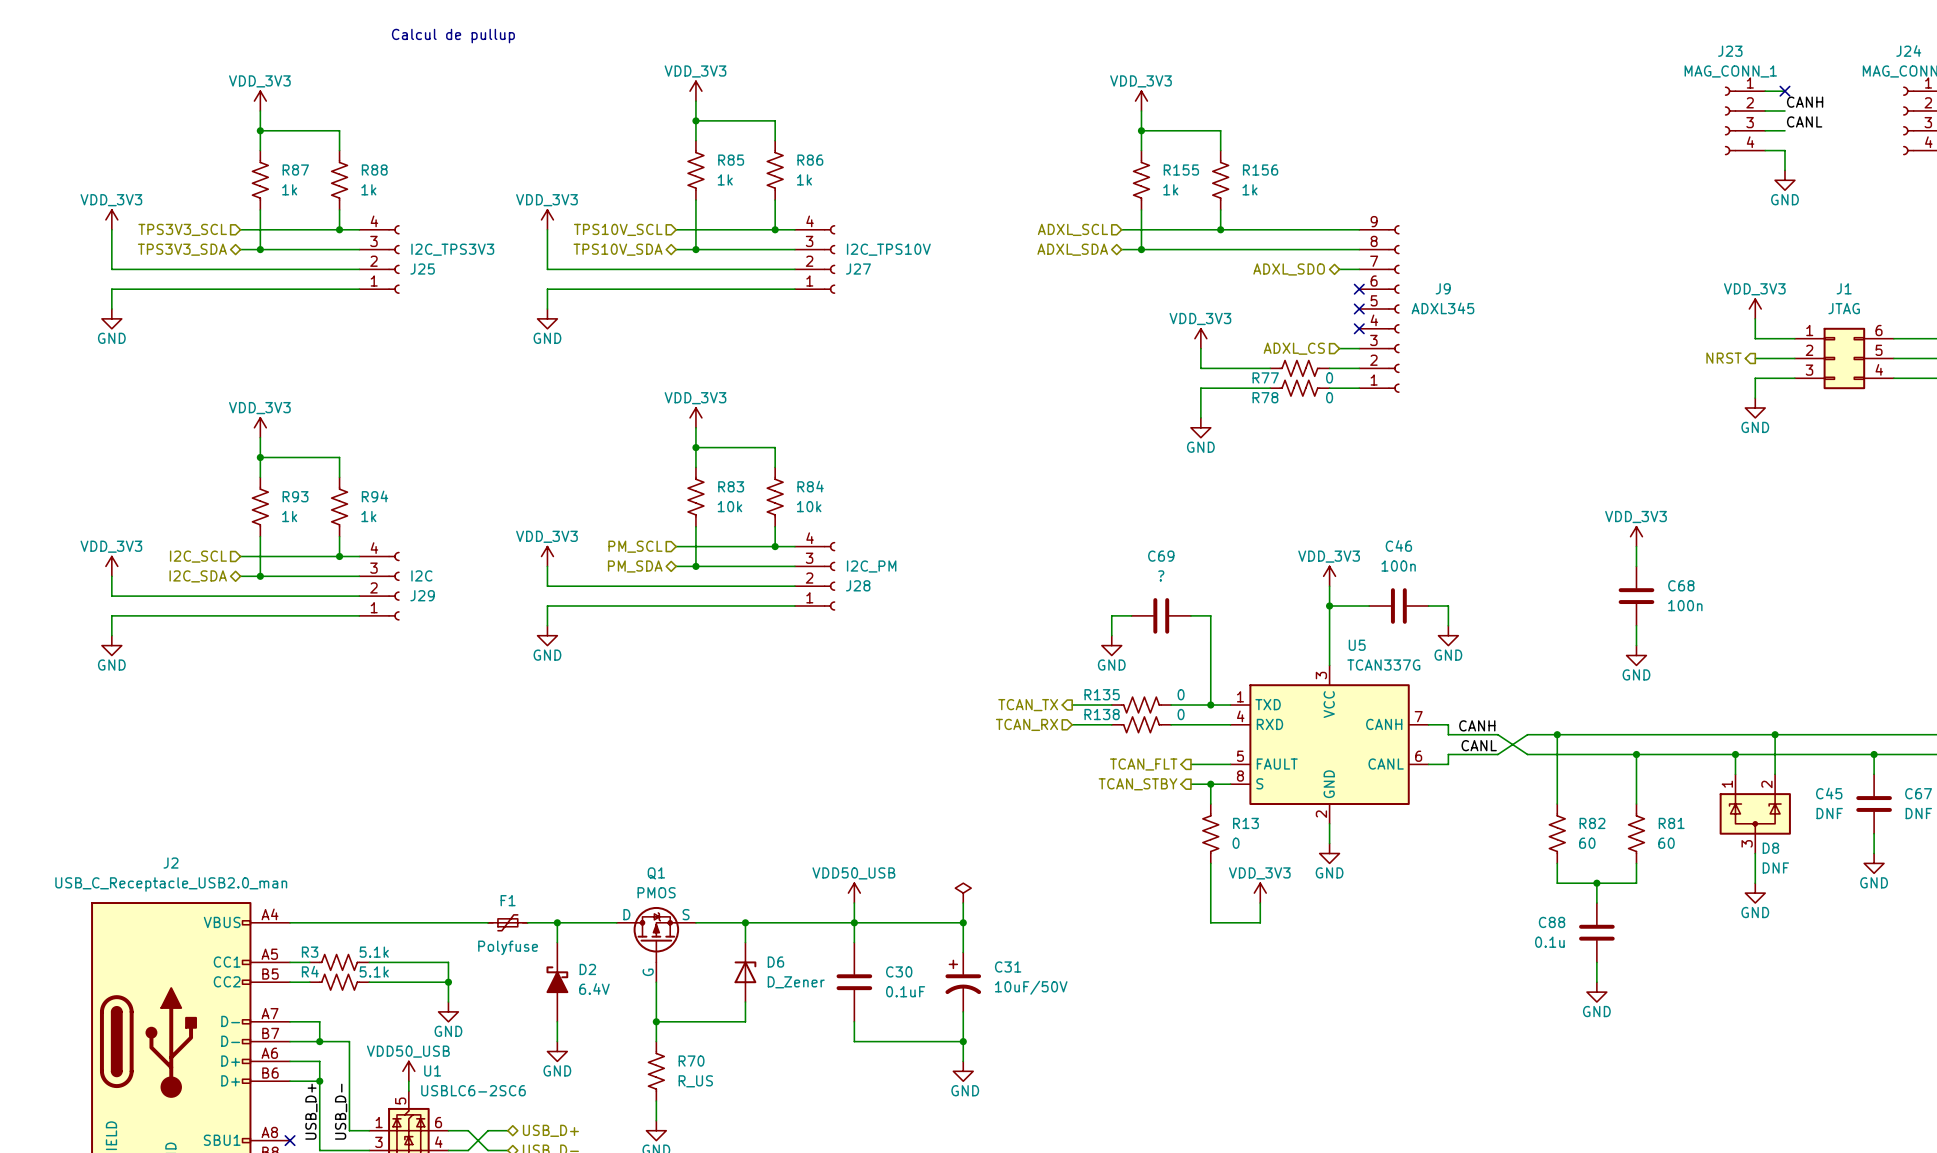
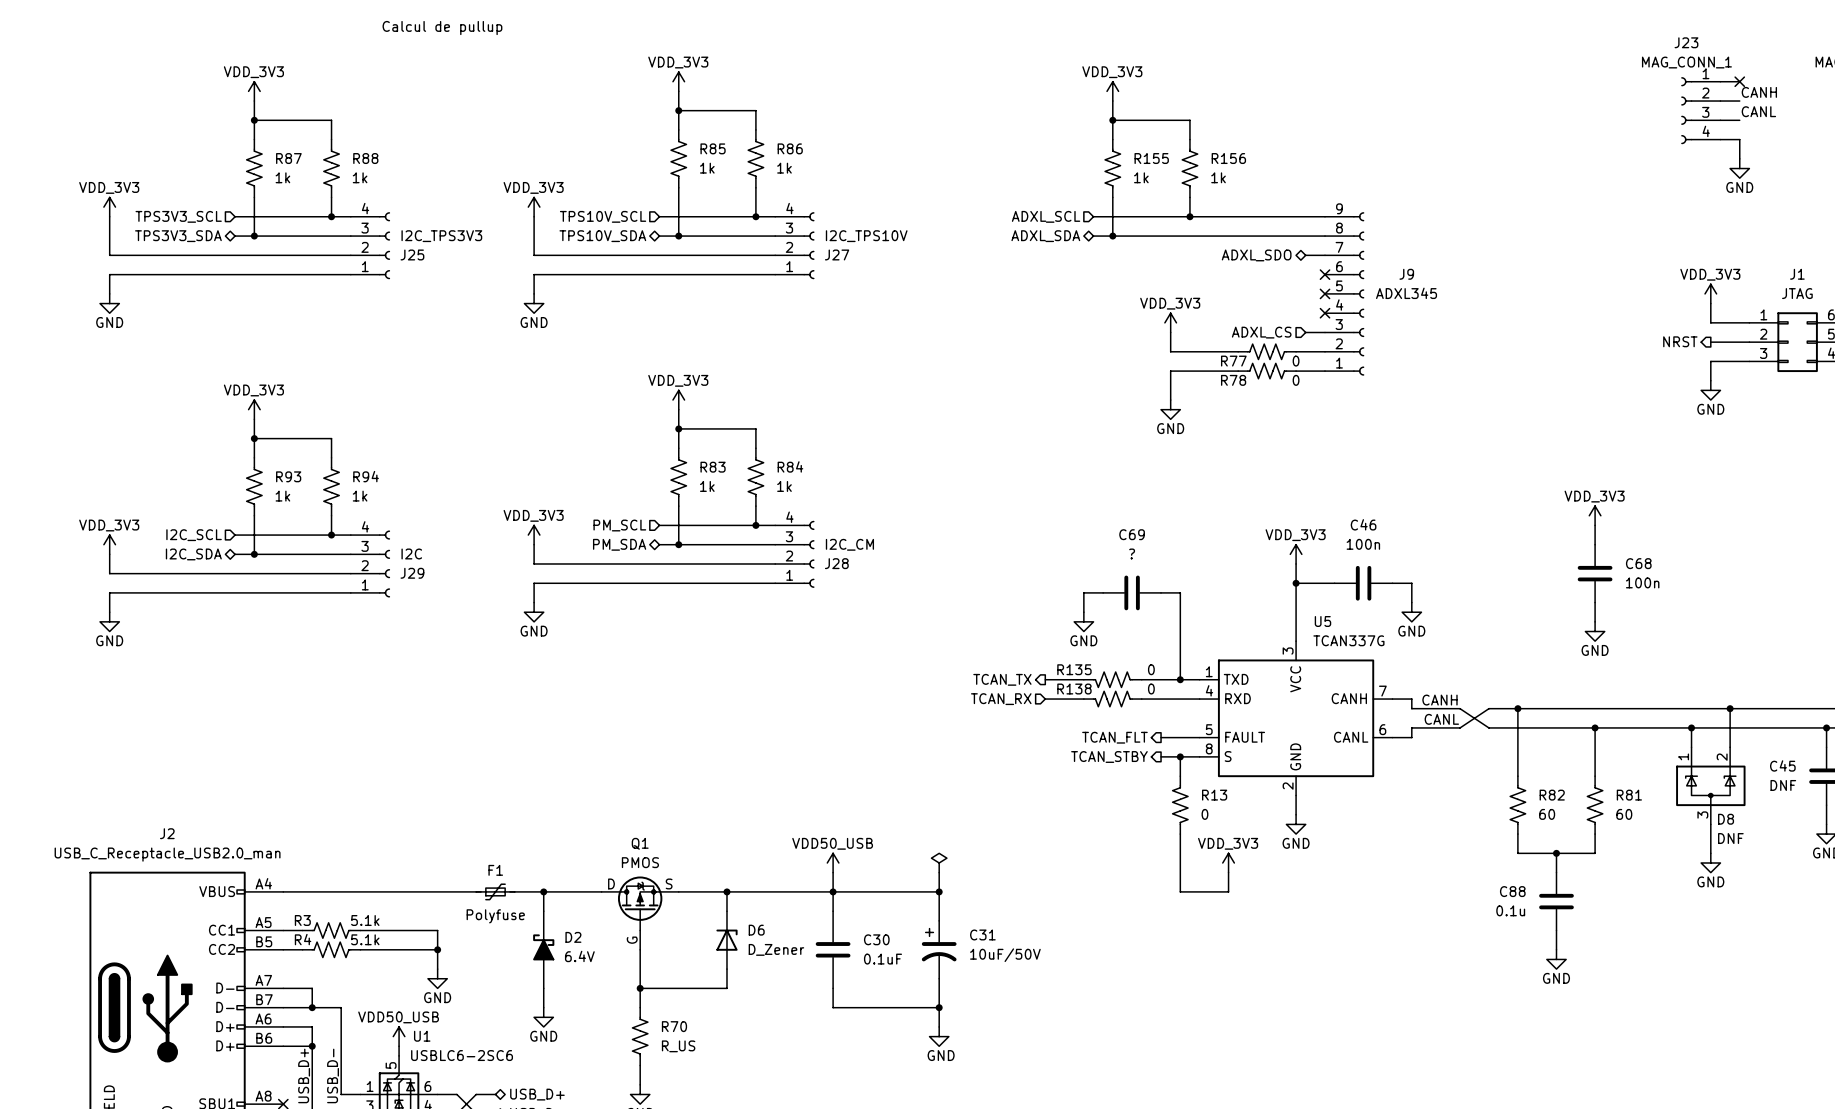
R83 value: 10k (729, 506) -> 1k (707, 486)
R84 value: 10k (809, 506) -> 1k (784, 486)
J28 value: I2C_PM (871, 566) -> I2C_CM (849, 544)

